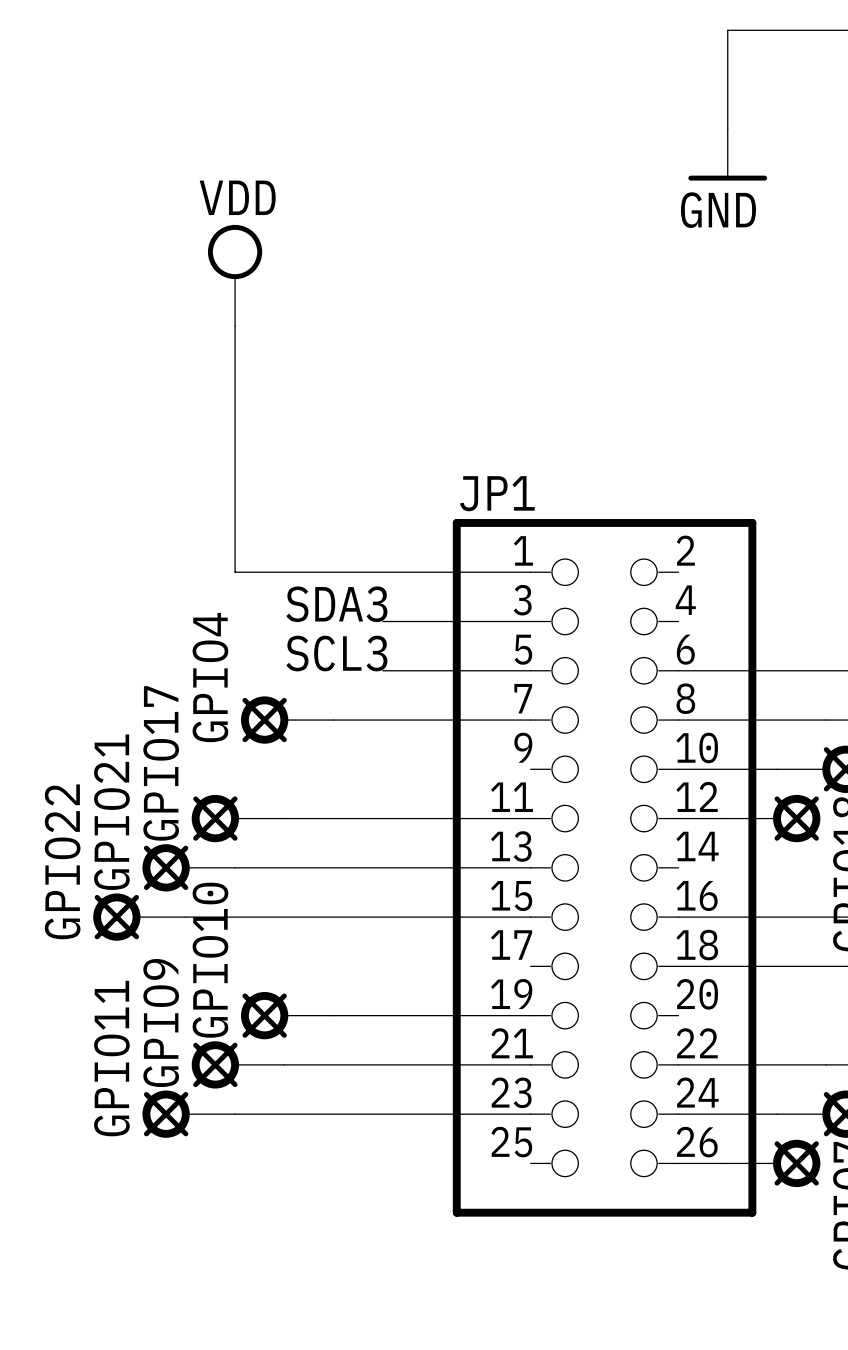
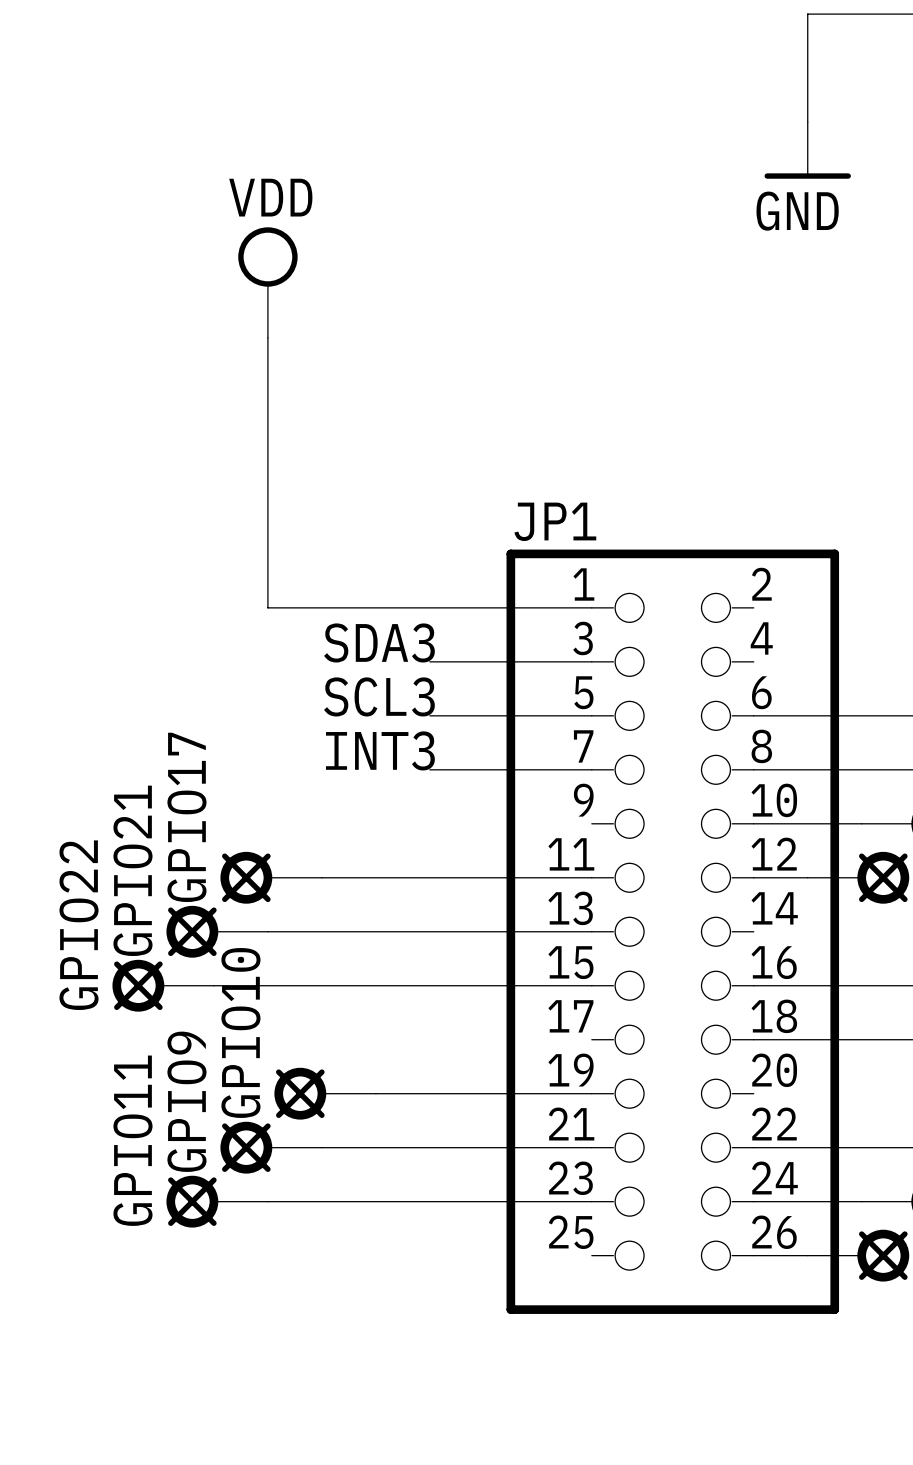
label: none -> INT3 (380, 750)
GPIO4: (287, 720) -> none
wire: (333, 720) (382, 720) -> none

